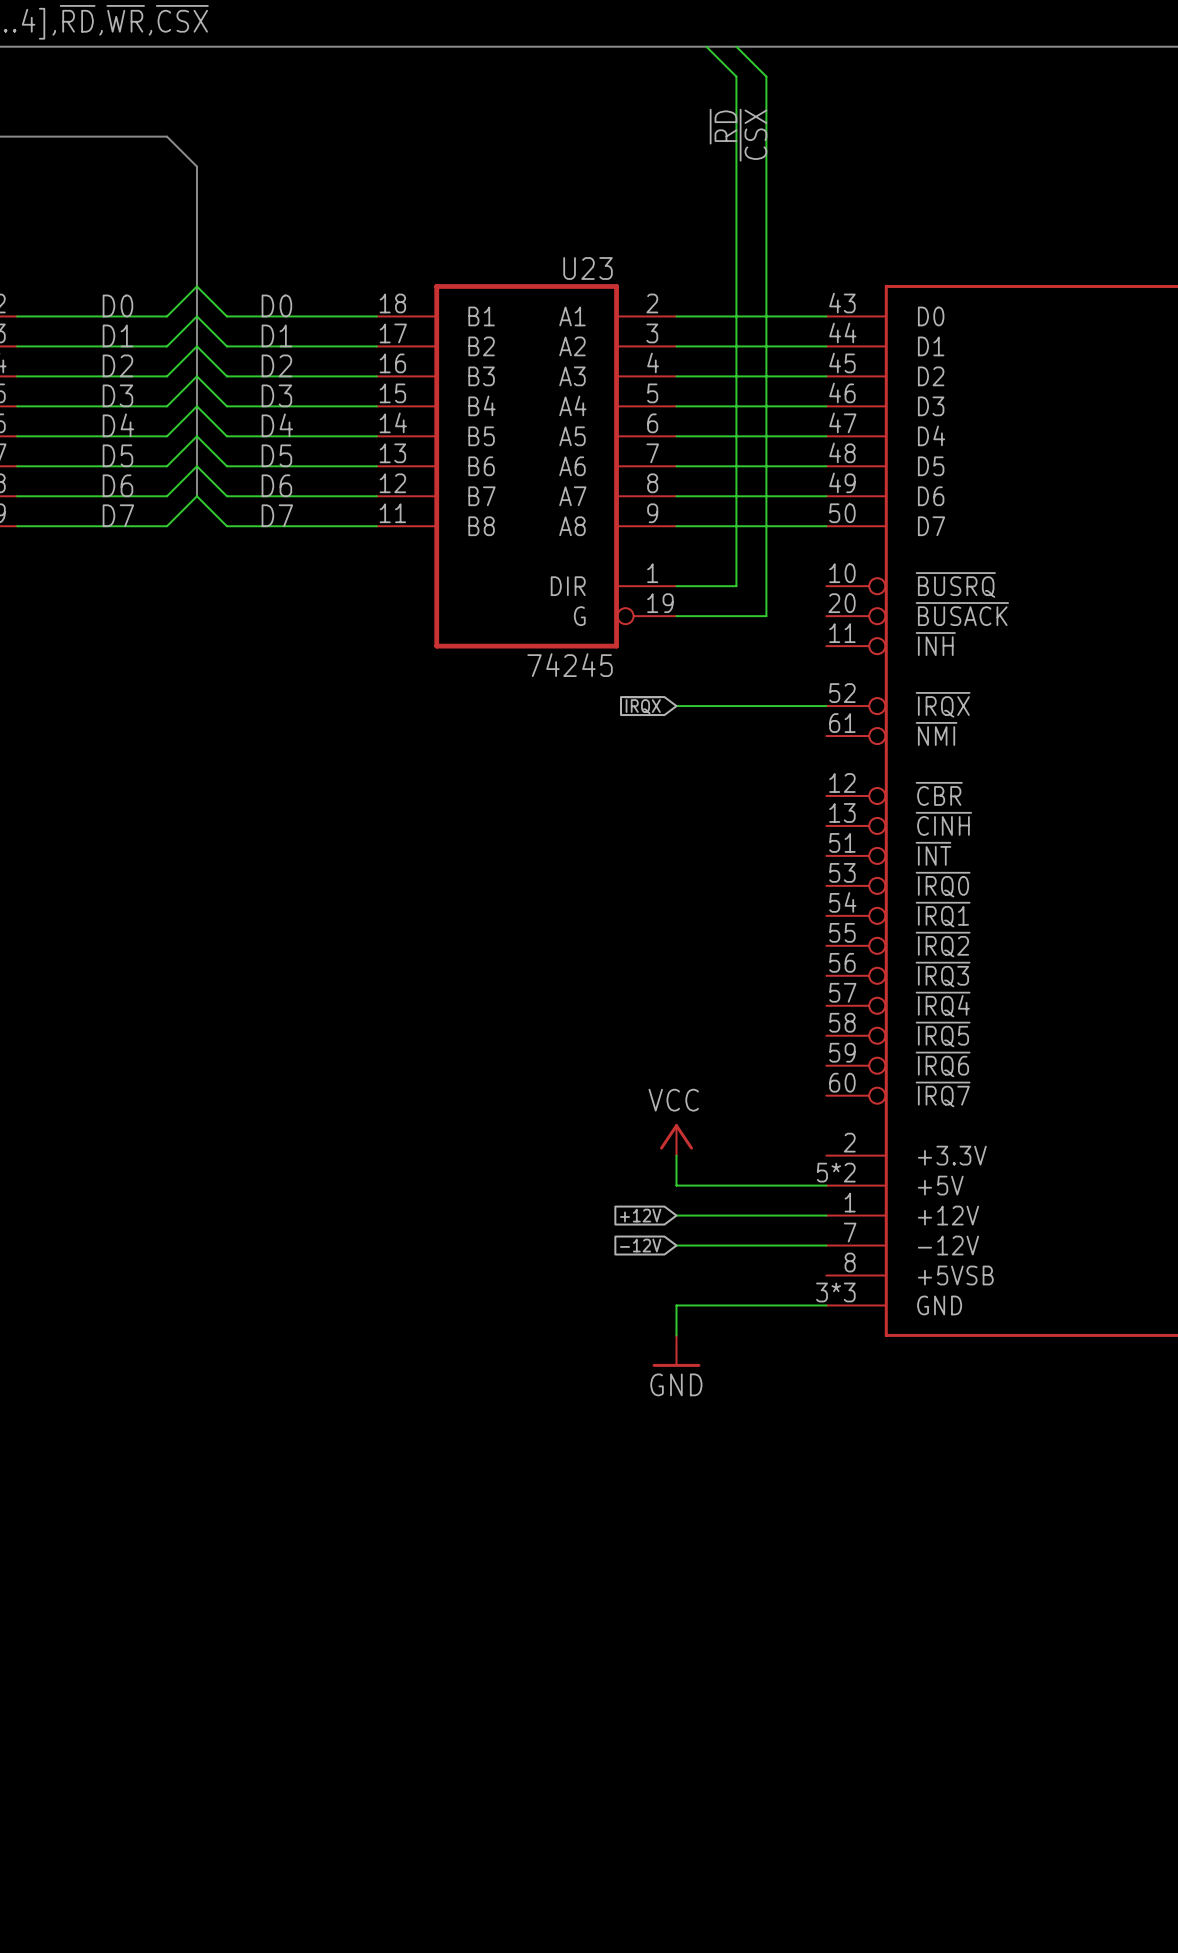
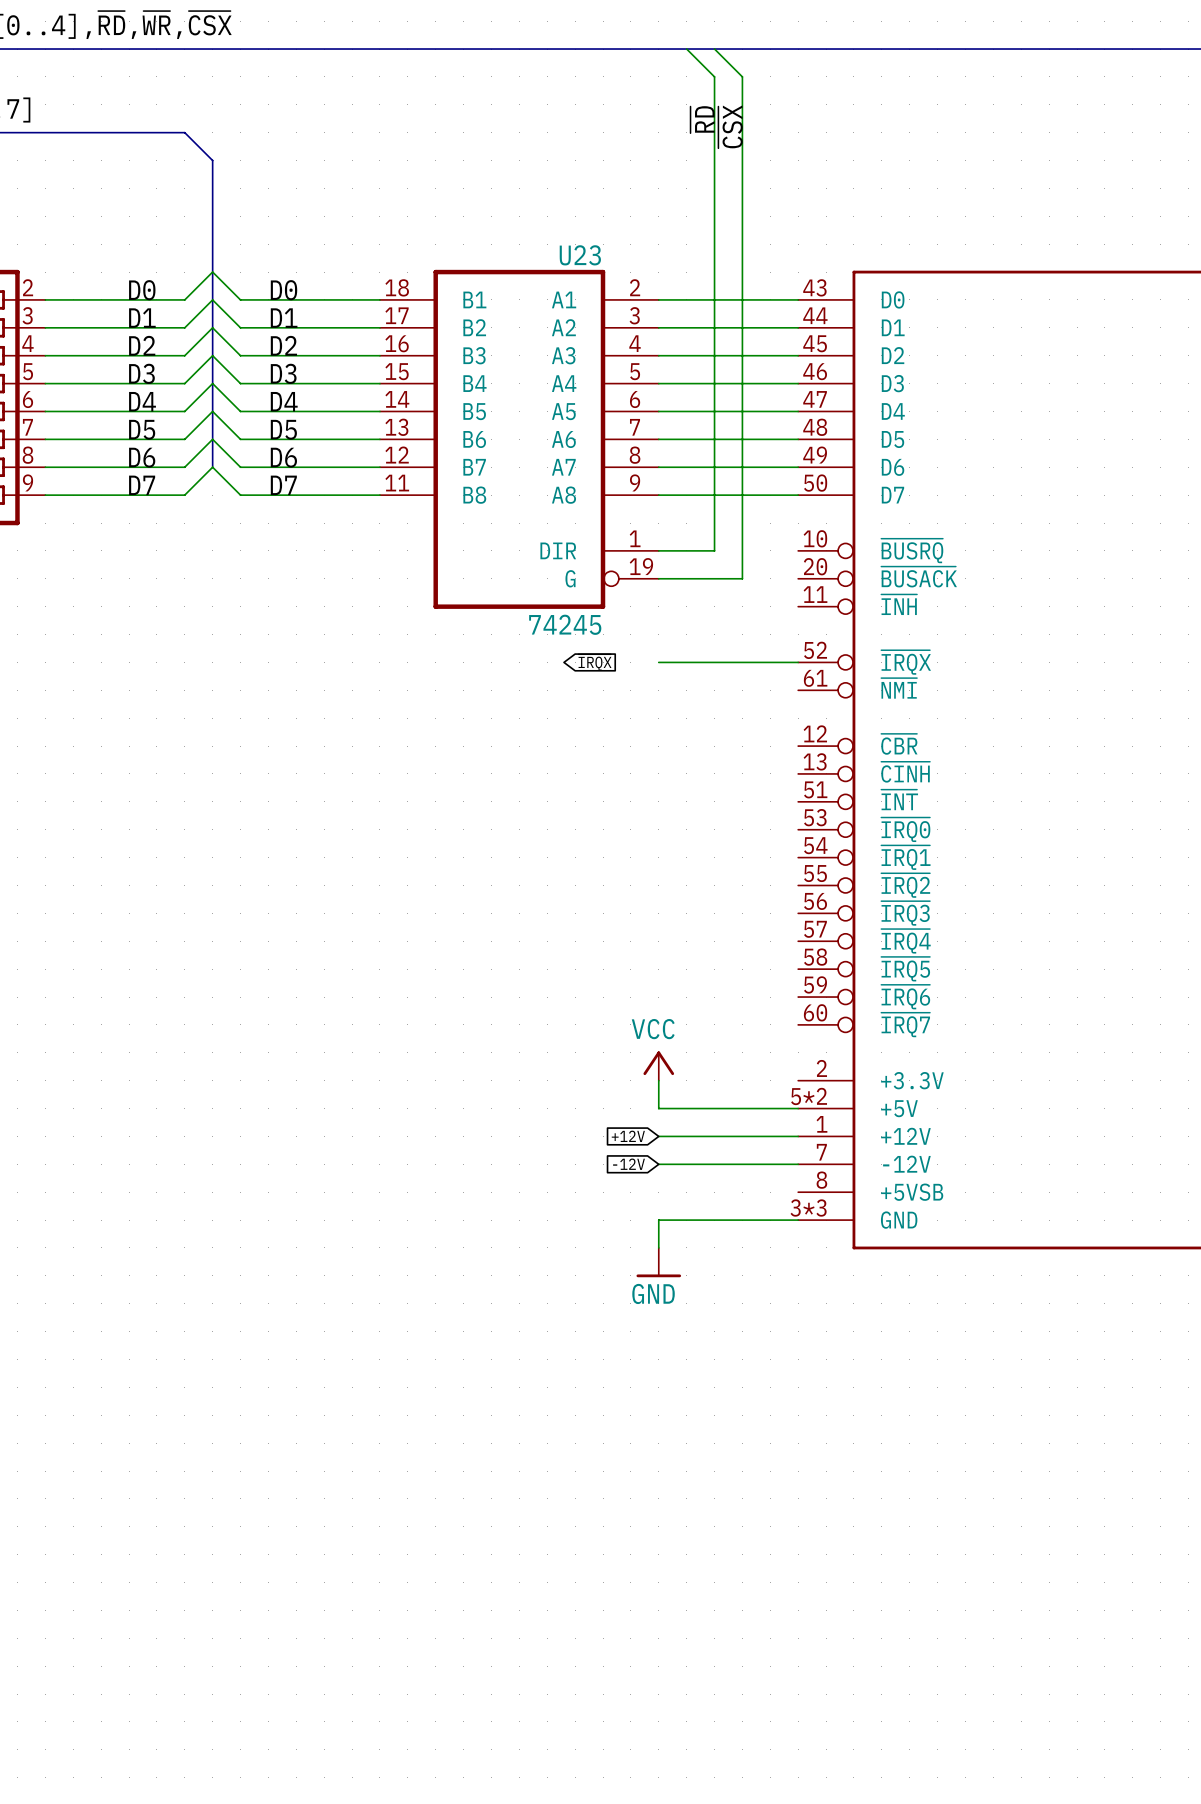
global label rotation: 0° (642, 705) -> 180° (594, 662)

